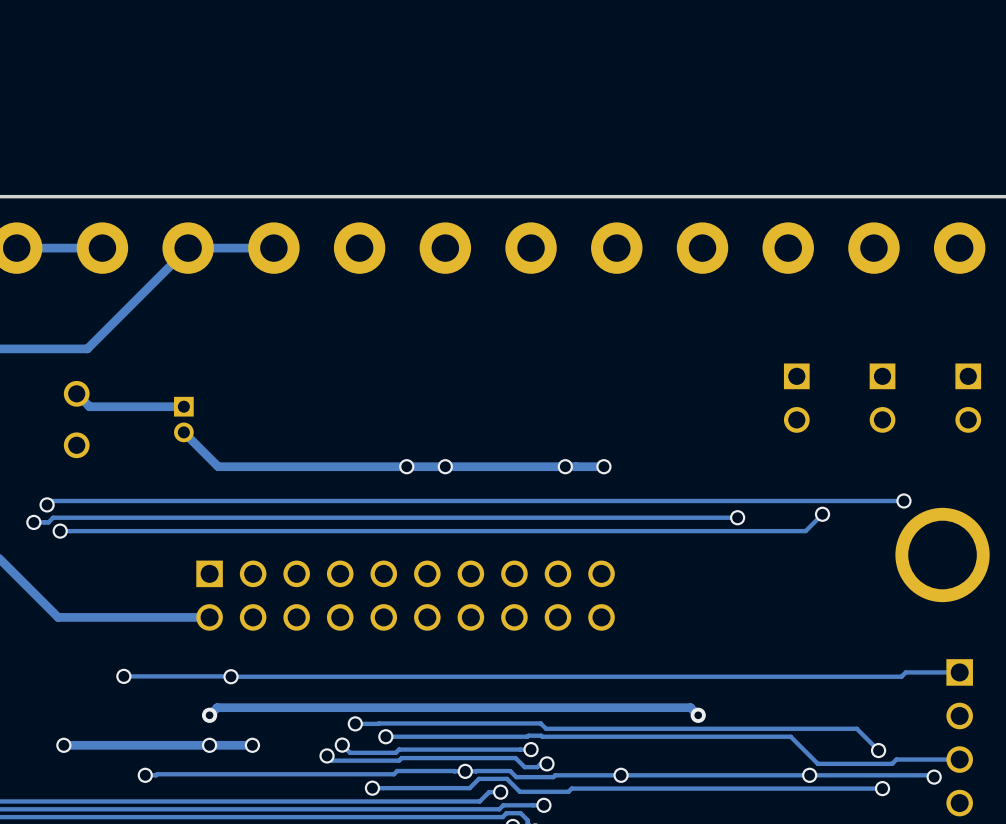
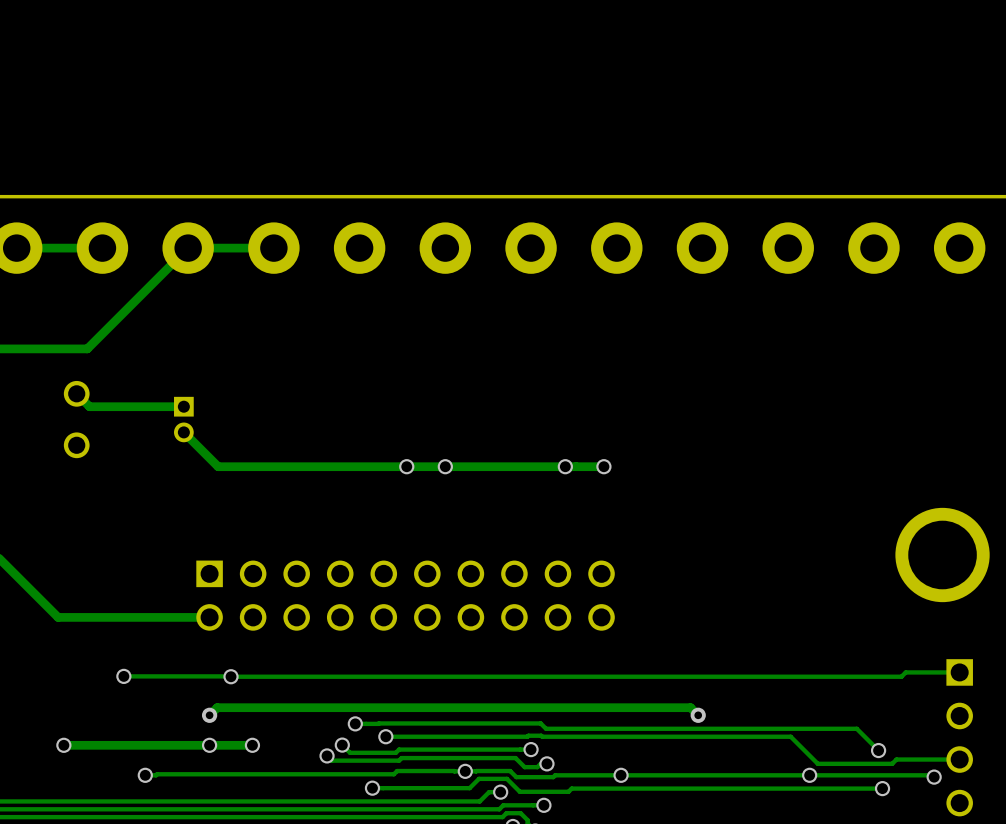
part: (796, 398) -> none
part: (882, 398) -> none
part: (968, 398) -> none
track: (903, 500) (51, 500) (47, 504) -> none
via: (903, 500) -> none
via: (47, 504) -> none
track: (822, 514) (805, 531) (60, 531) -> none
via: (822, 514) -> none
track: (737, 517) (53, 517) (48, 522) (33, 522) -> none
via: (737, 517) -> none
via: (33, 522) -> none
via: (60, 531) -> none

